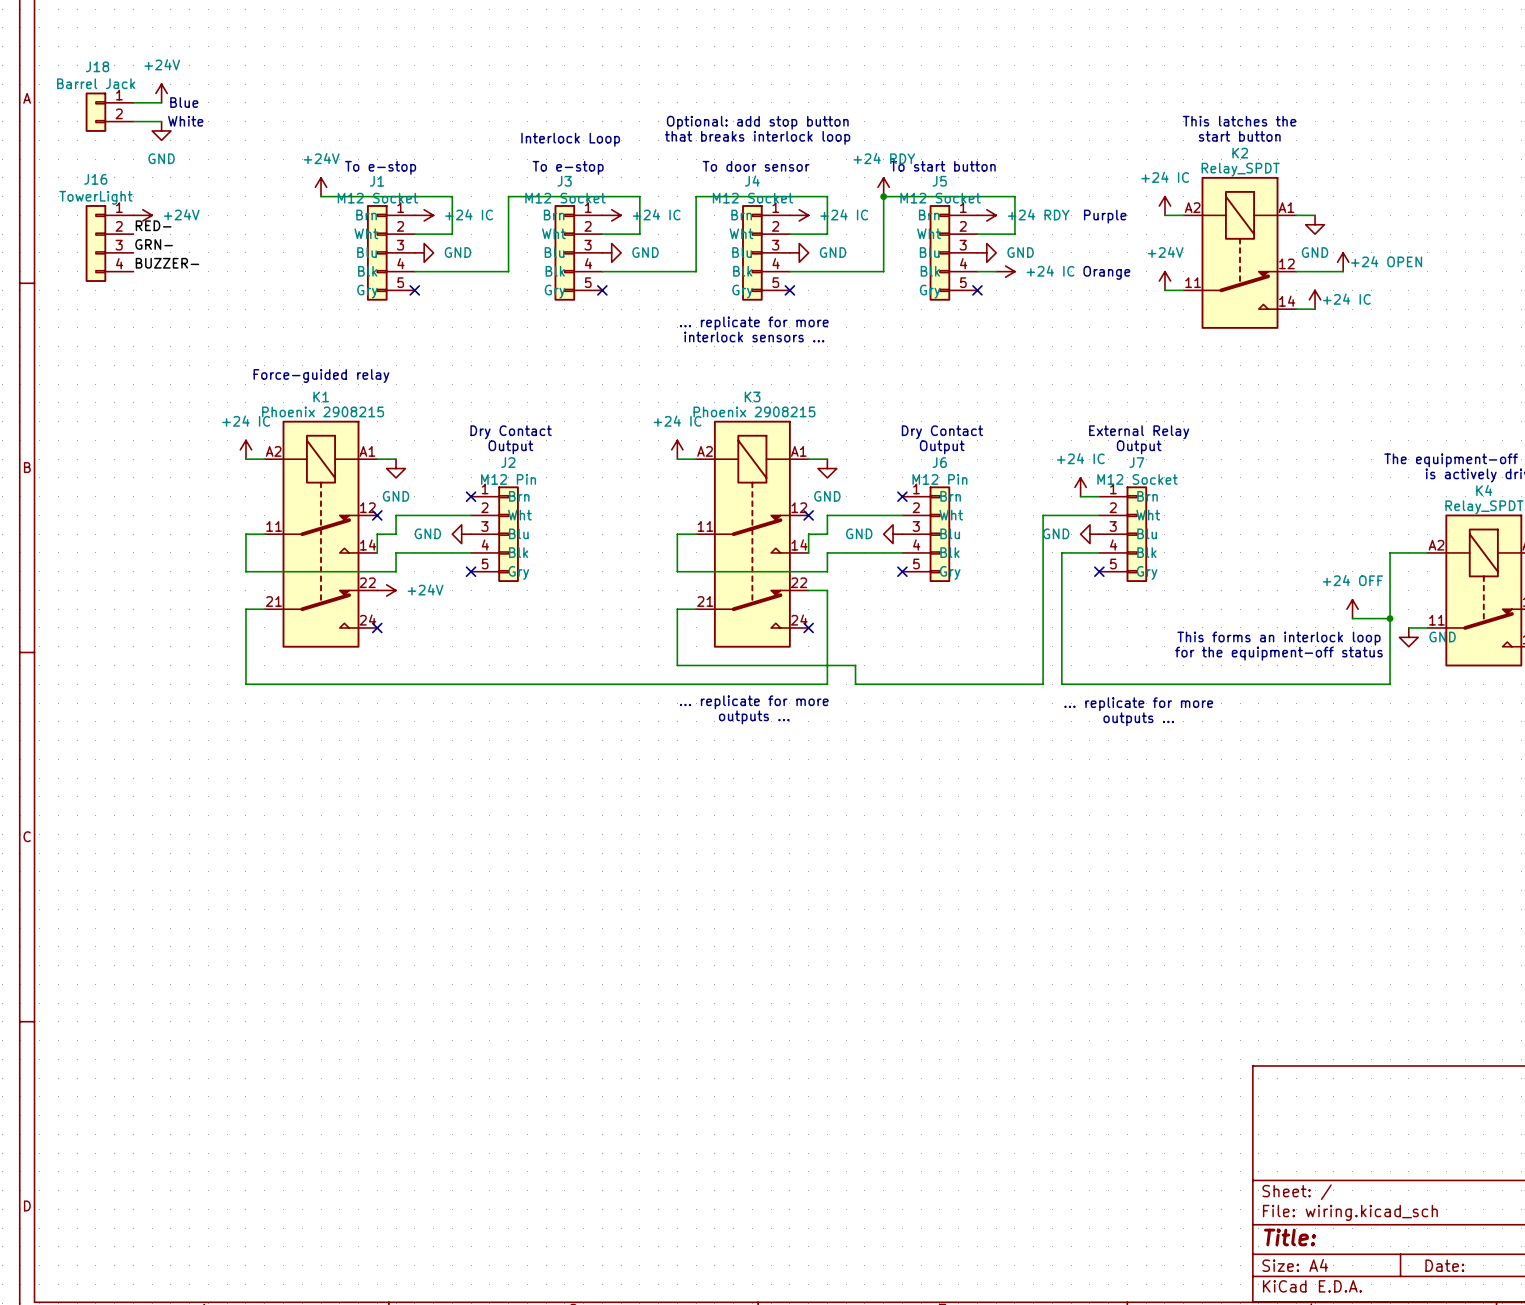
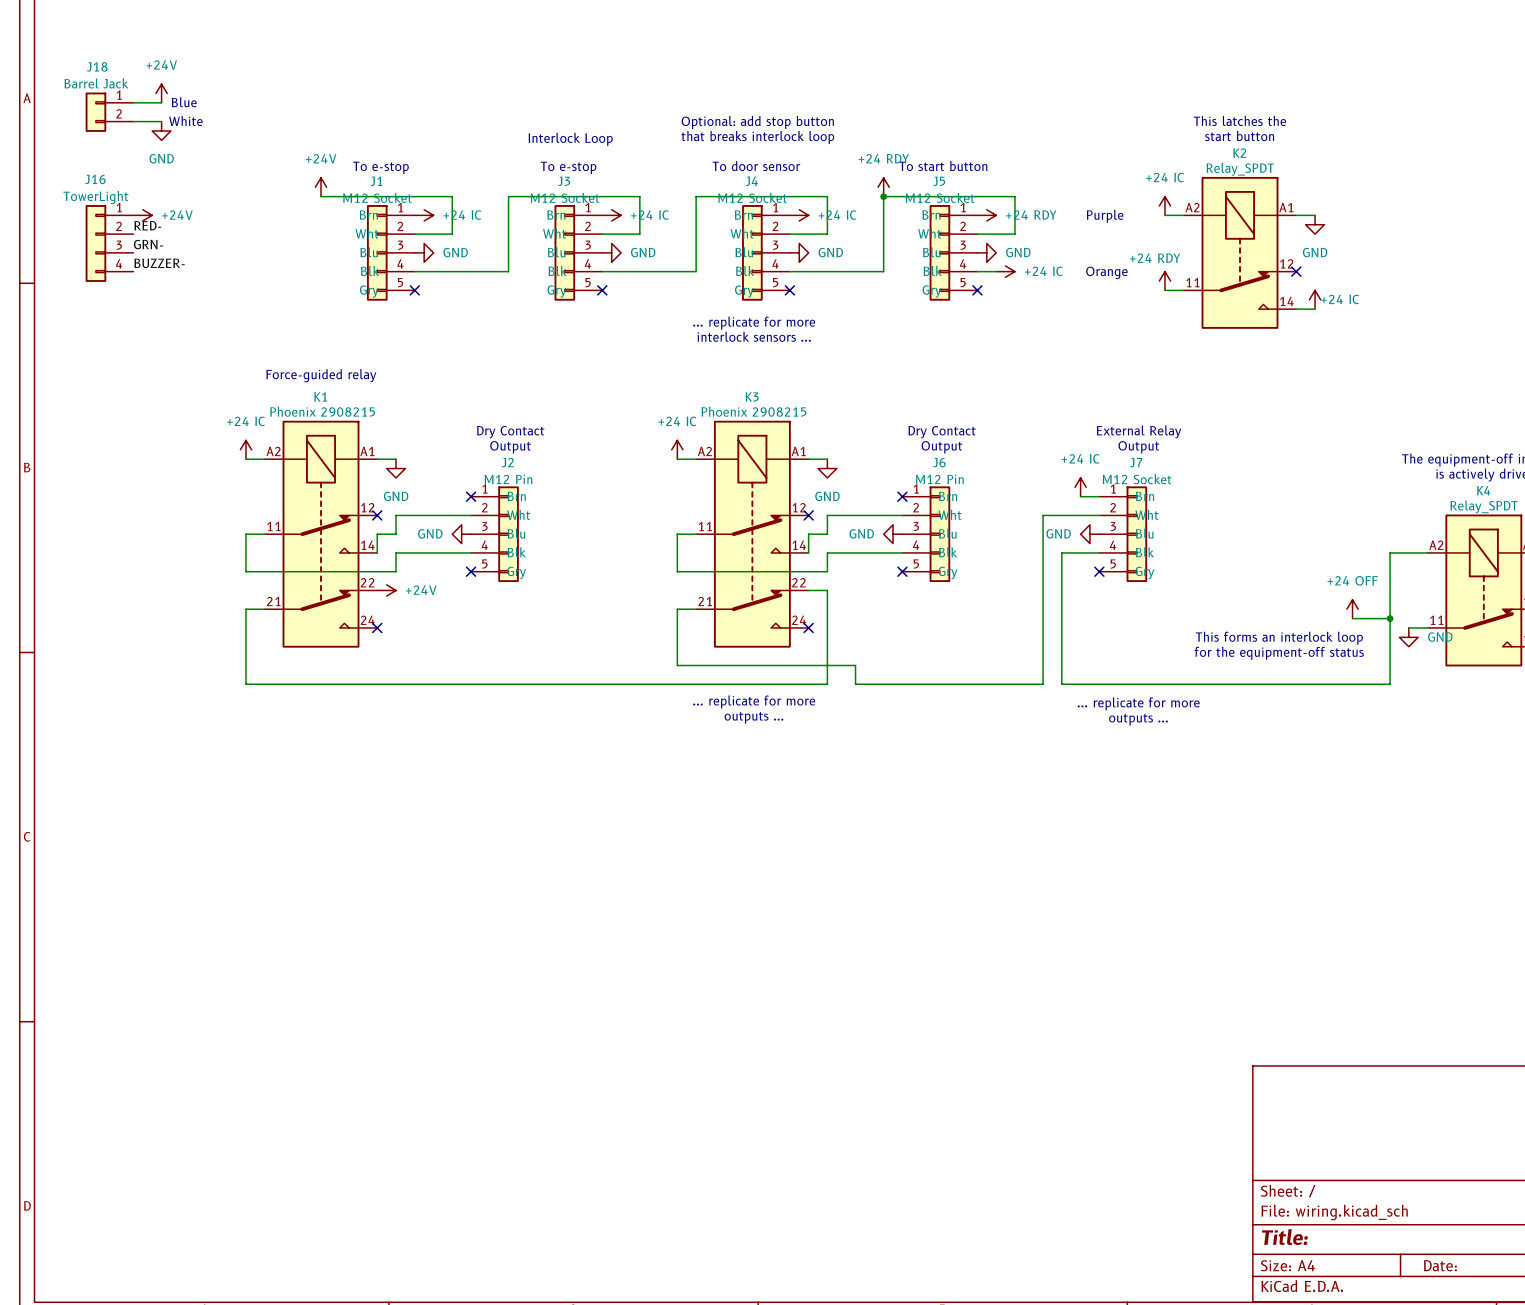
power symbol: +24 OPEN (1343, 262) -> none
wire: (1296, 271) (1343, 271) -> none
no-connect mark: none -> (1296, 271)
power symbol: +24V (1164, 281) -> +24 RDY (1164, 281)

